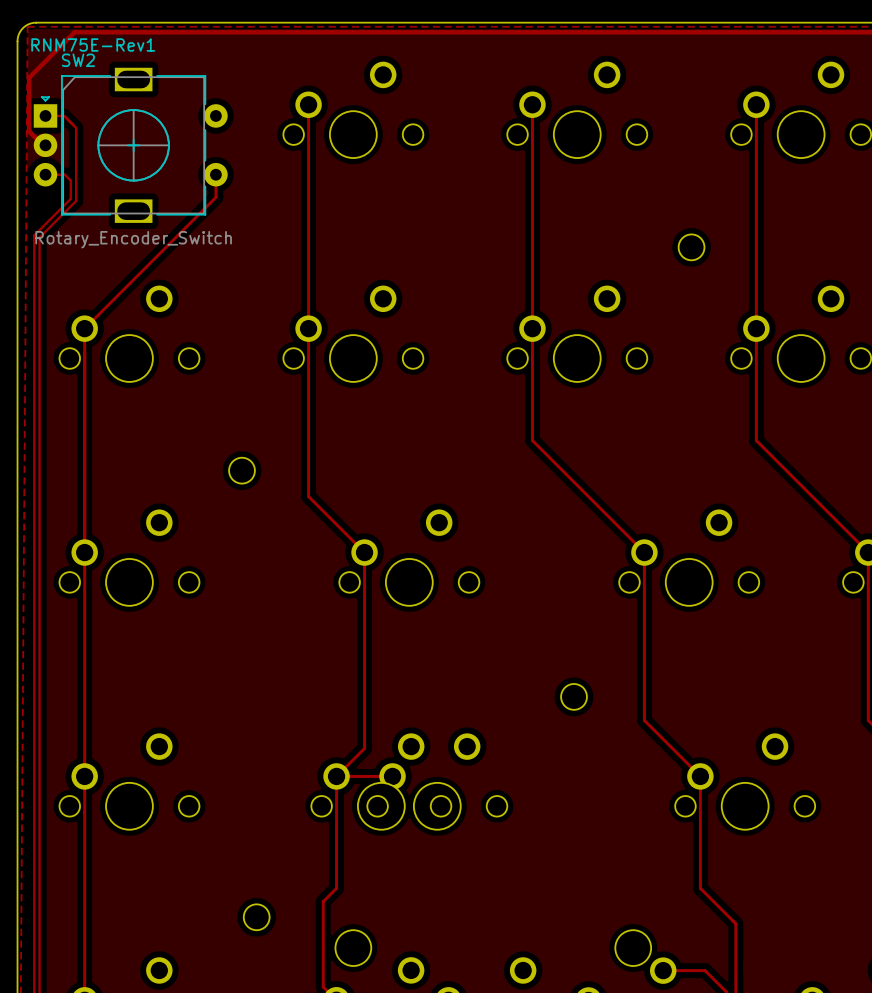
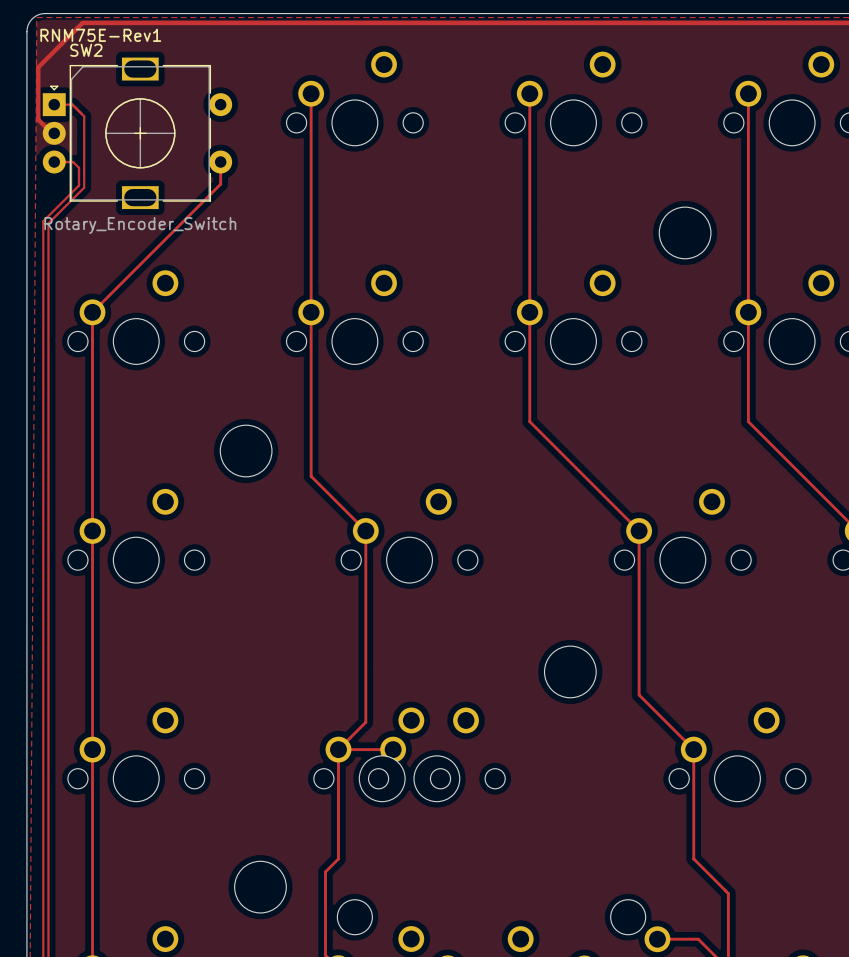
round board edge size: [678, 234, 705, 261] -> [659, 206, 712, 260]
round board edge size: [228, 457, 256, 484] -> [220, 424, 273, 478]
round board edge size: [560, 683, 588, 711] -> [544, 645, 597, 699]
round board edge size: [243, 904, 270, 931] -> [234, 861, 287, 914]

